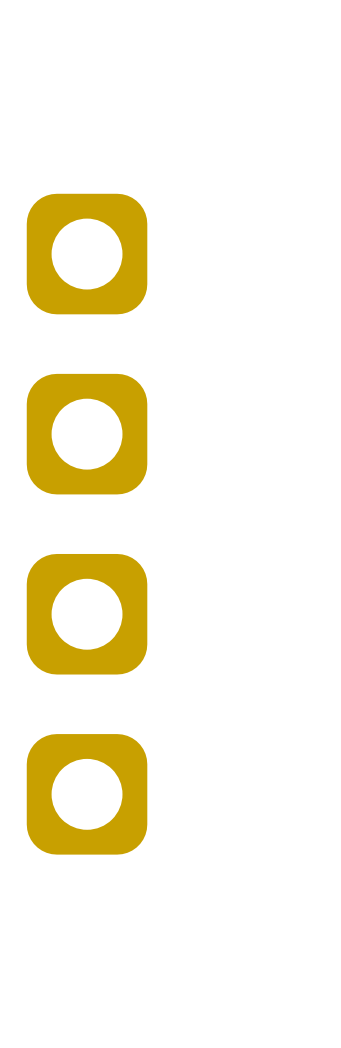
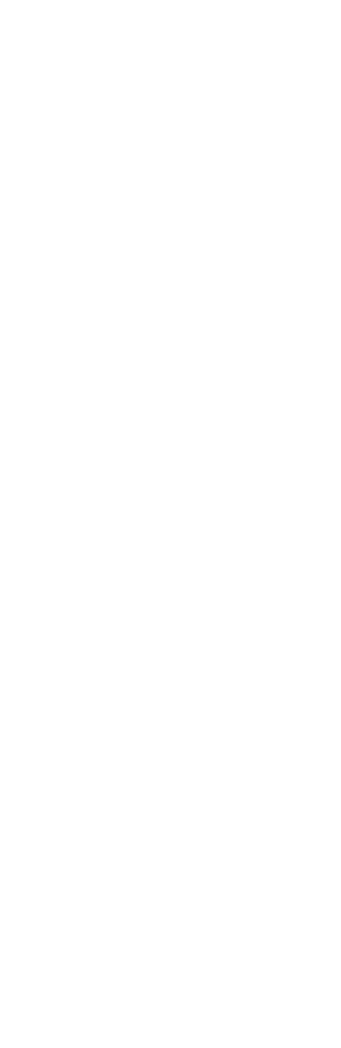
part: (87, 344) -> none
part: (87, 704) -> none

